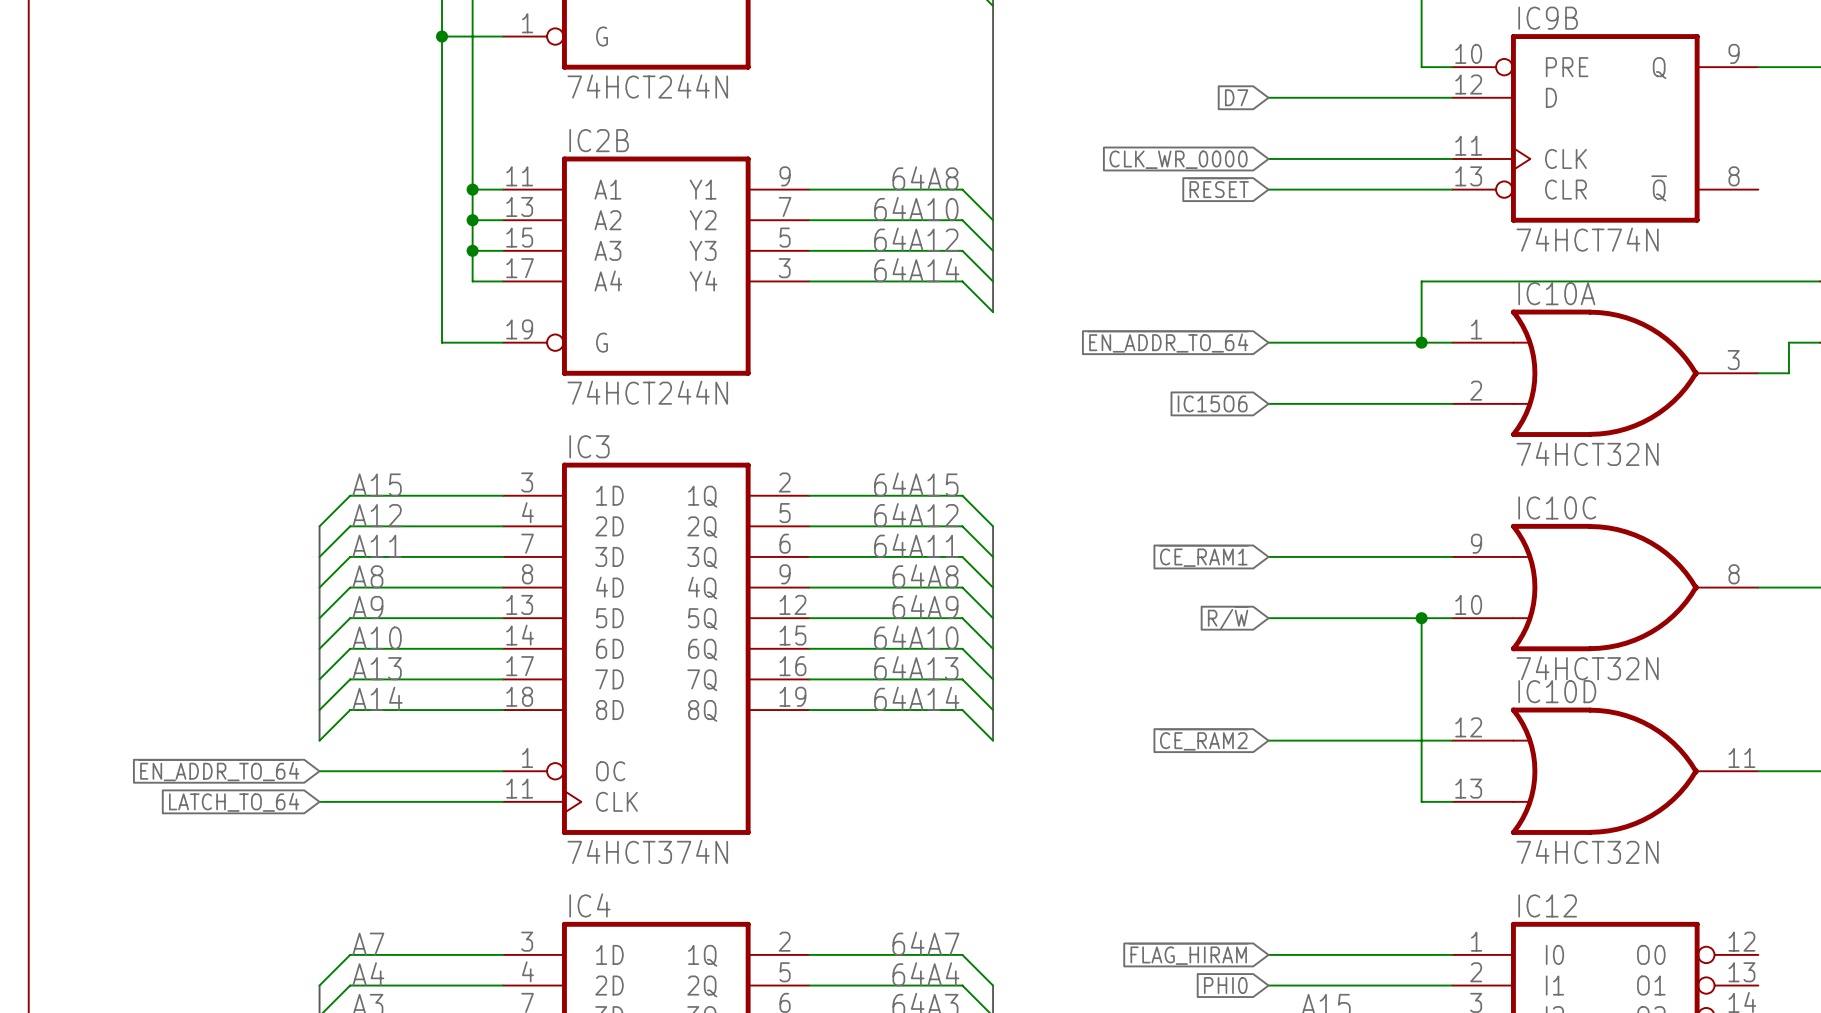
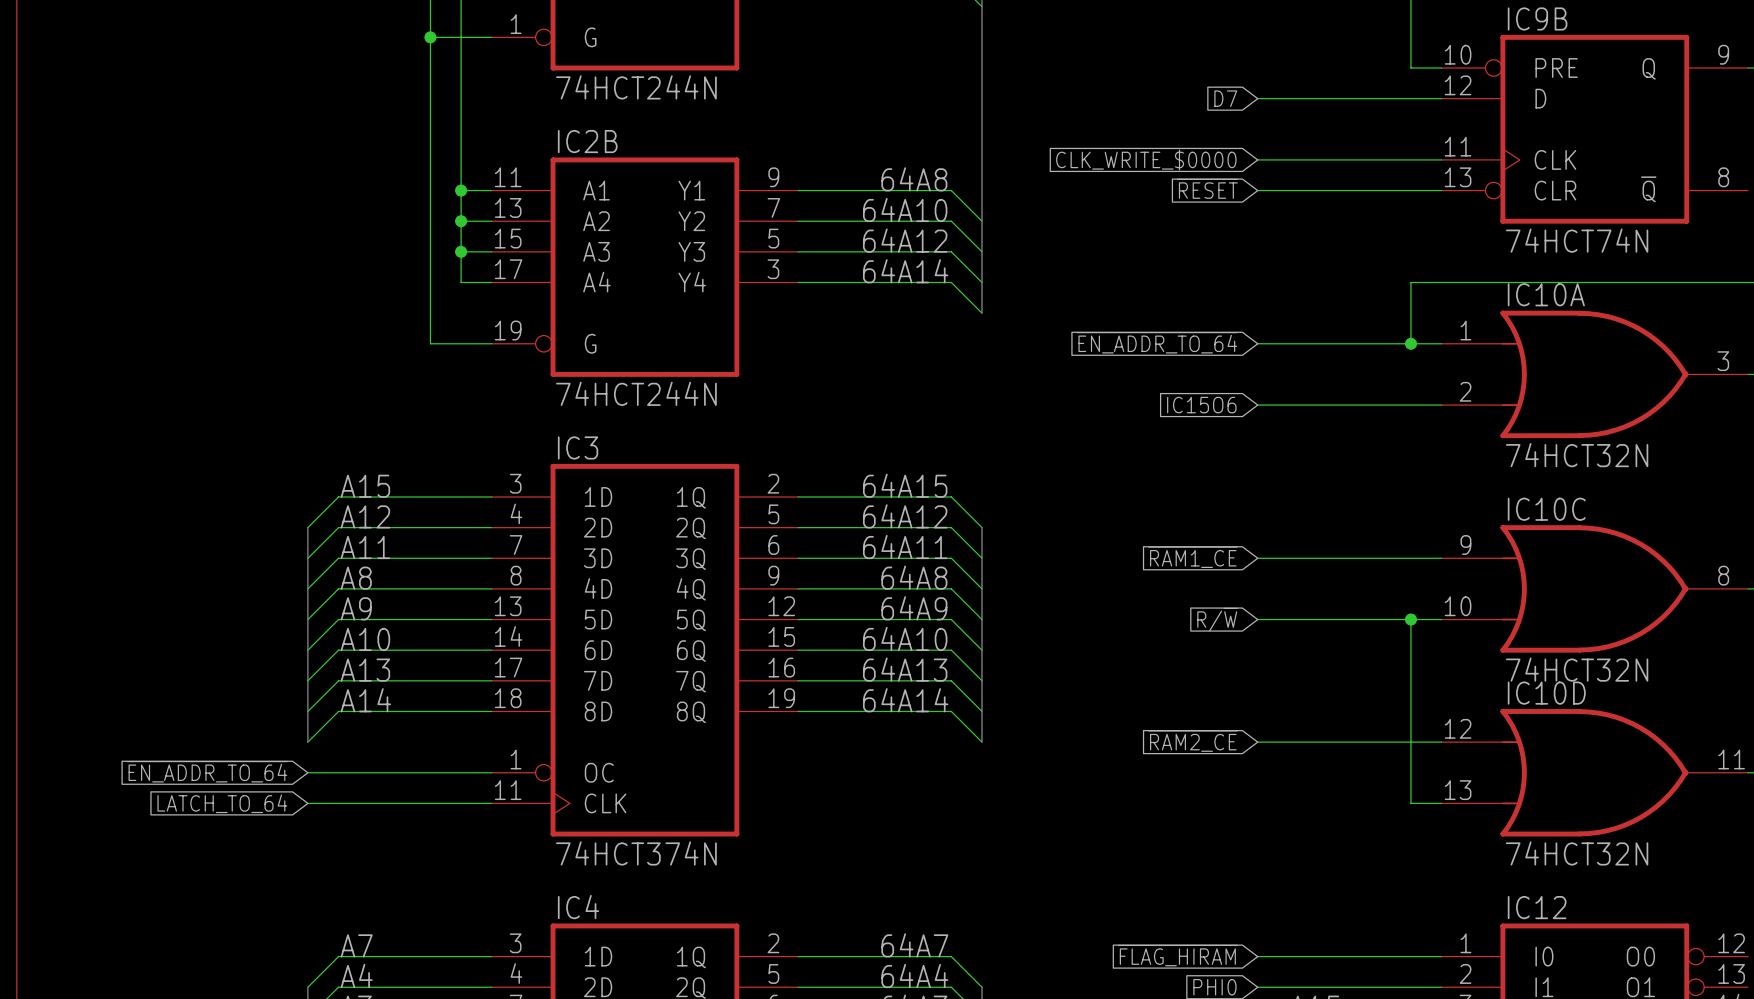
global label: CLK_WR_0000 (1178, 159) -> CLK_WRITE_$0000 (1146, 159)
global label: ~{CE_RAM1} (1203, 555) -> ~{RAM1_CE} (1192, 557)
global label: ~{CE_RAM2} (1203, 739) -> ~{RAM2_CE} (1192, 741)

